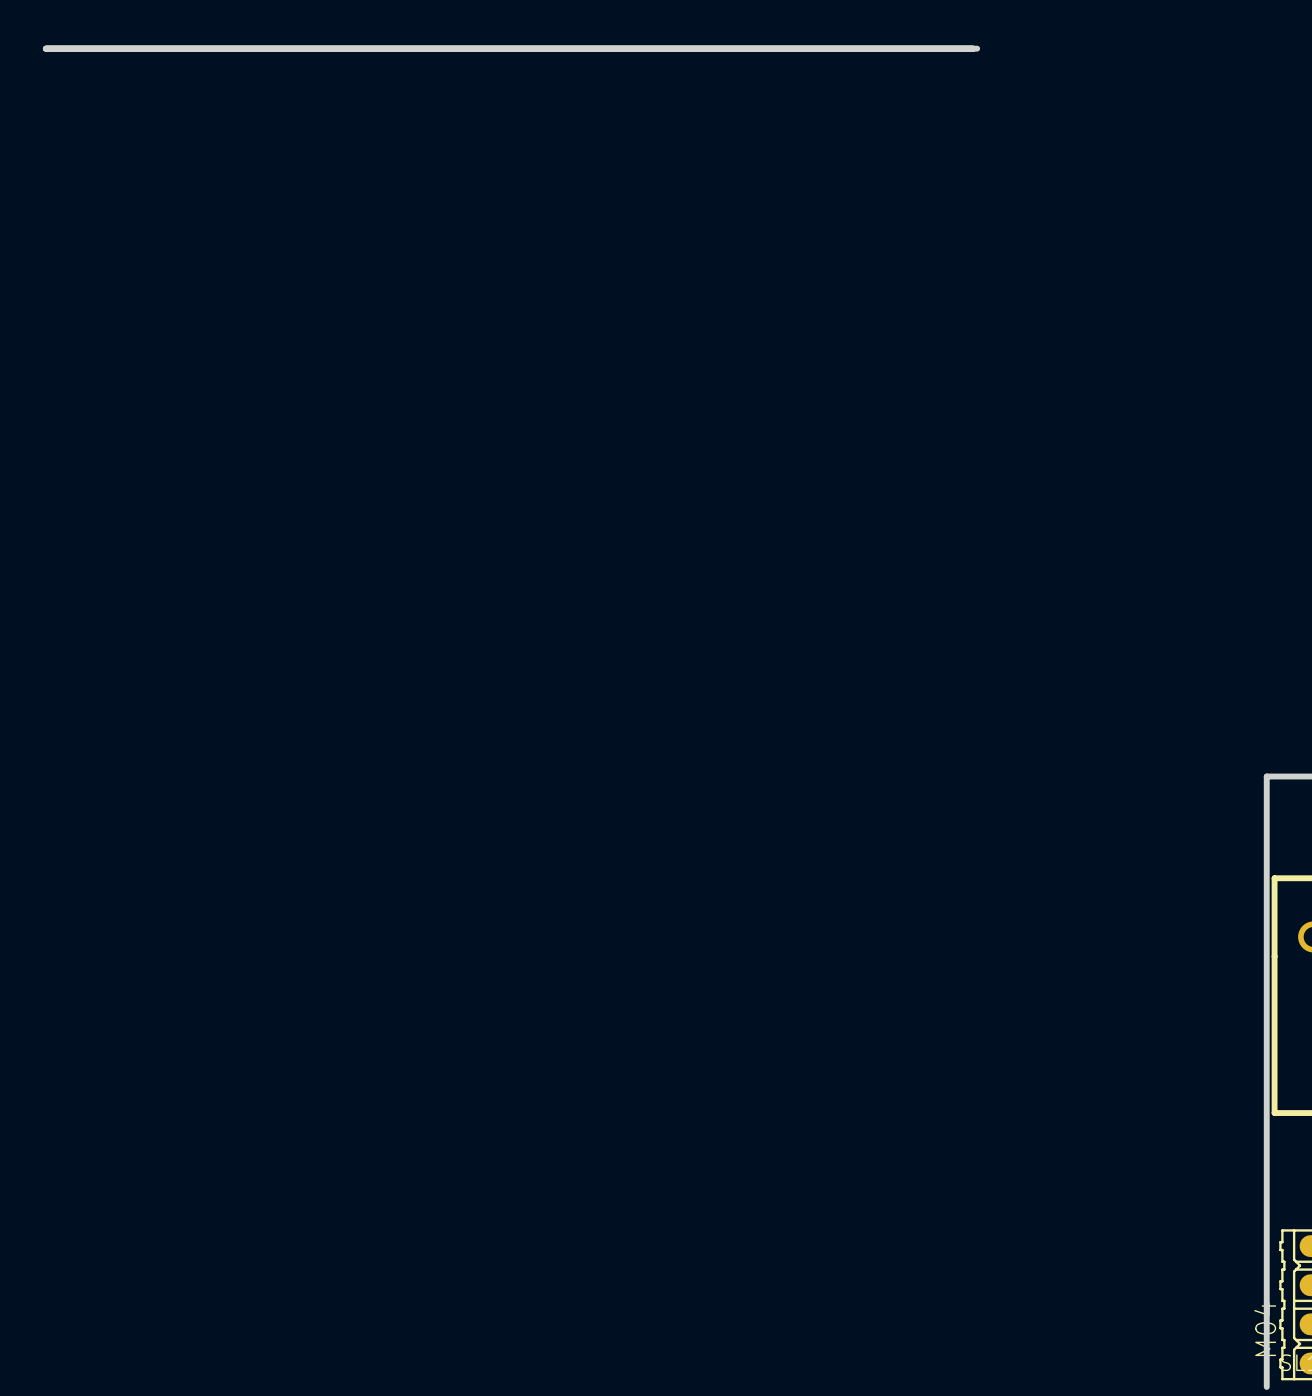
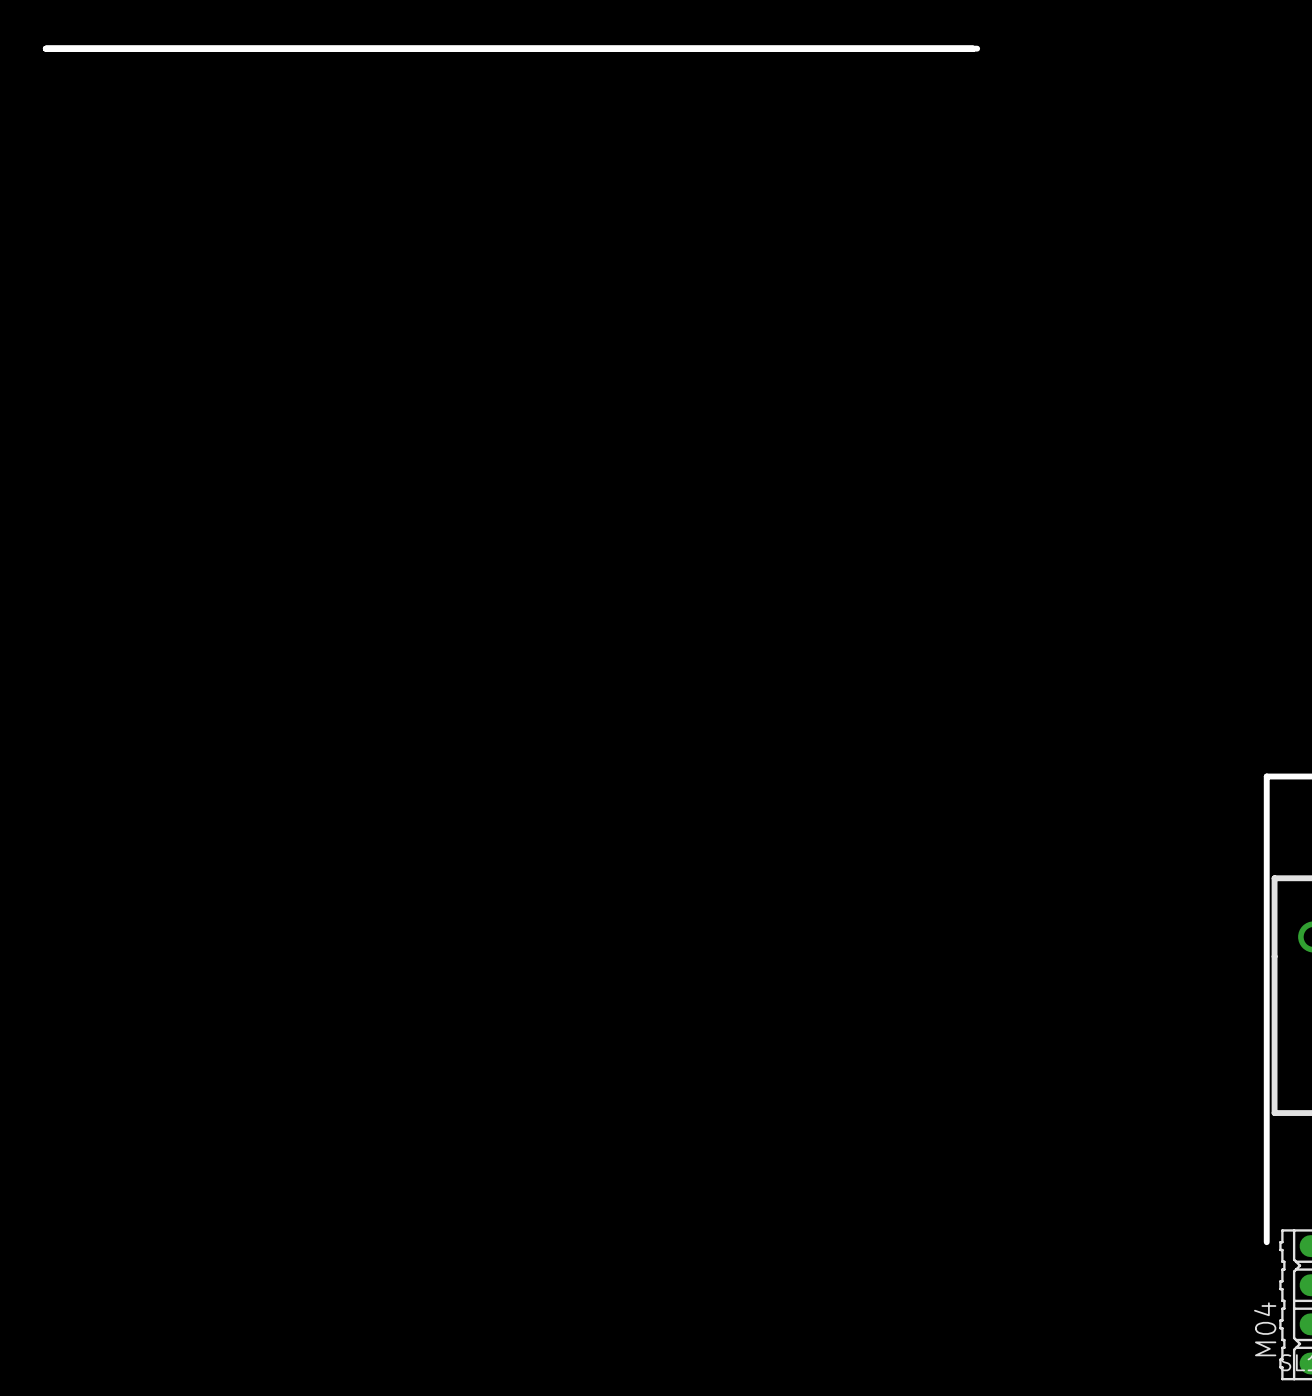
board edge: (1266, 1242) (1266, 1386) -> none

